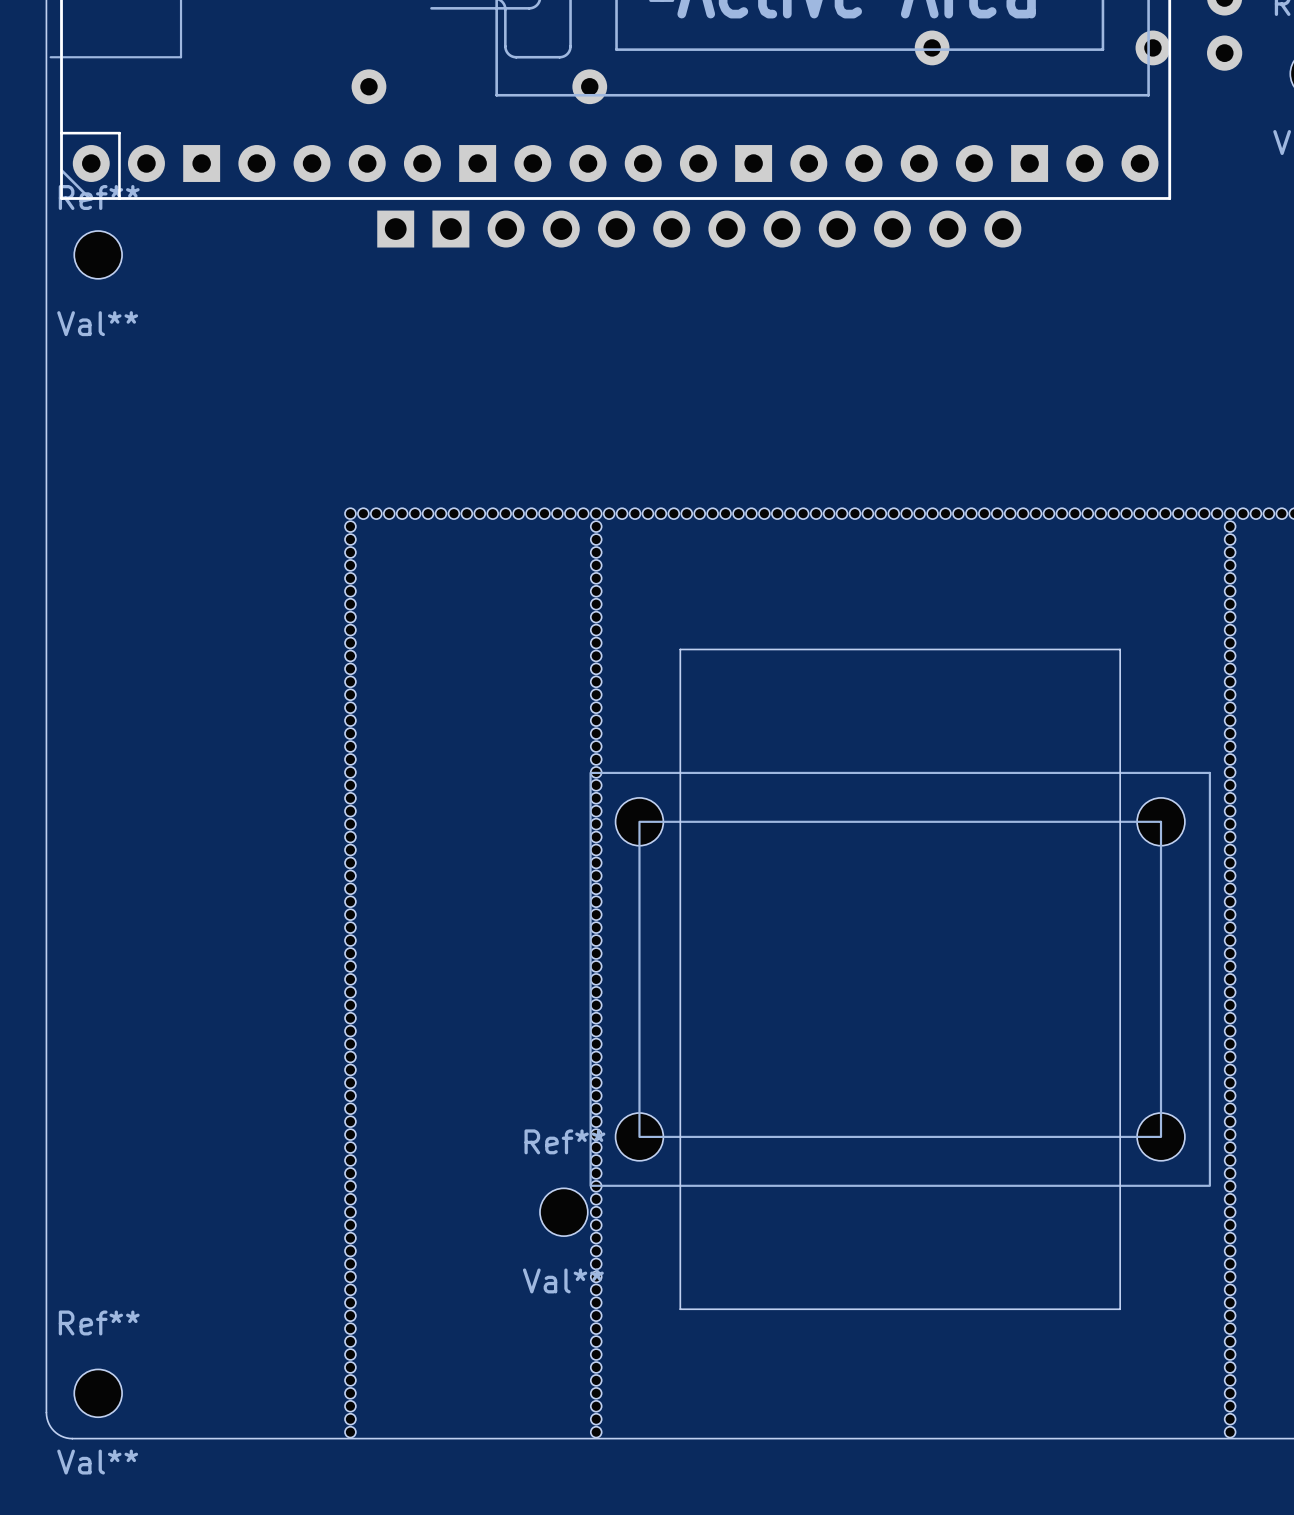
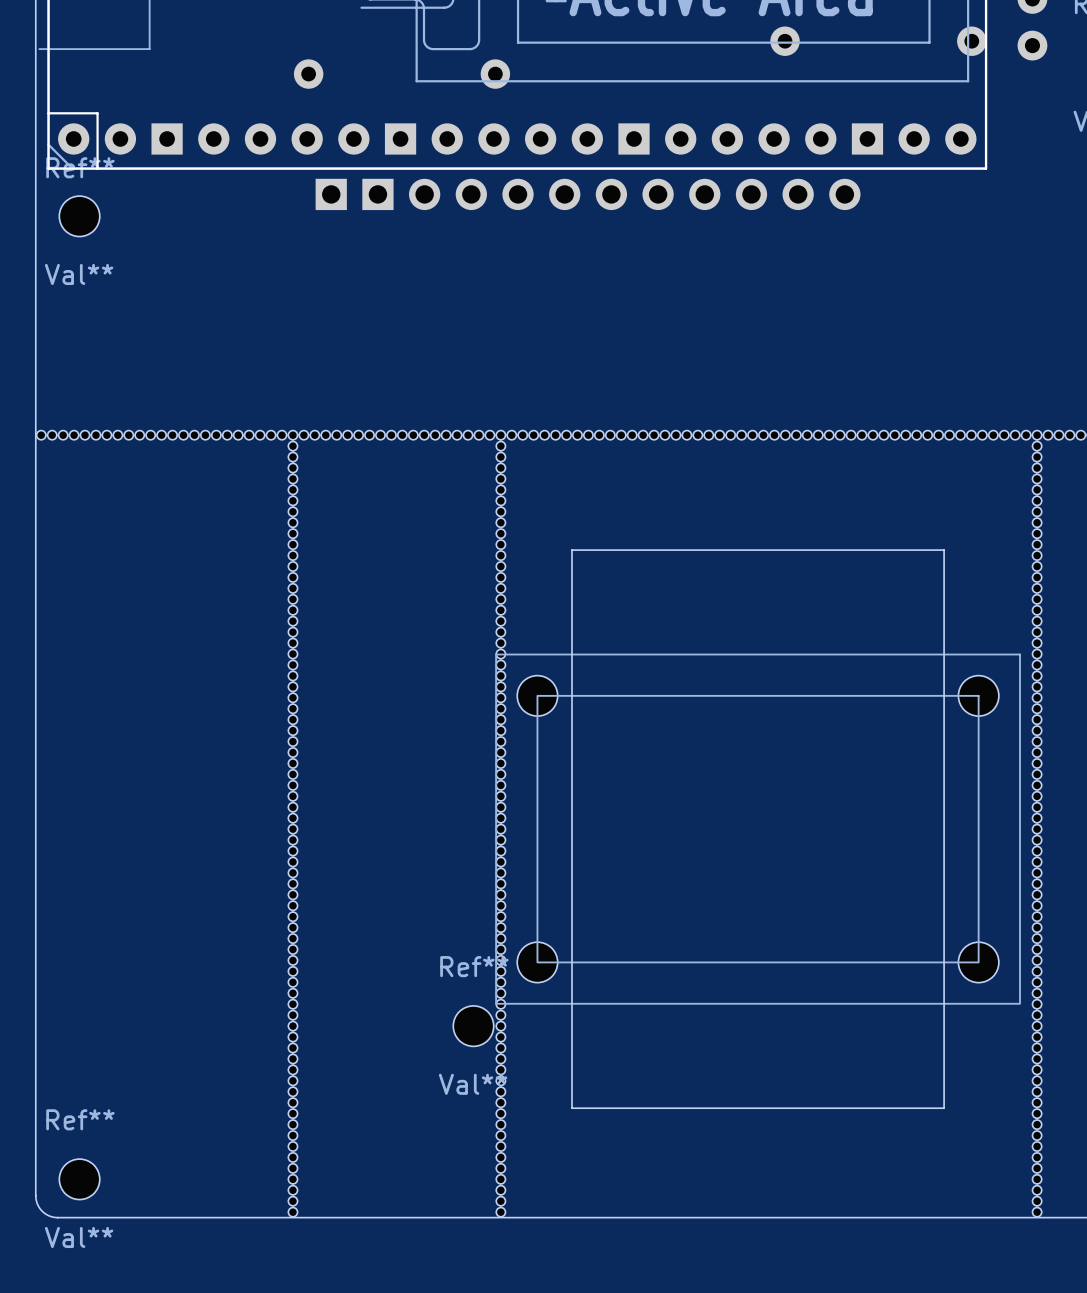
part: none -> (41, 435)
part: none -> (57, 435)
part: none -> (79, 435)
part: none -> (101, 435)
part: none -> (156, 435)
part: none -> (243, 435)

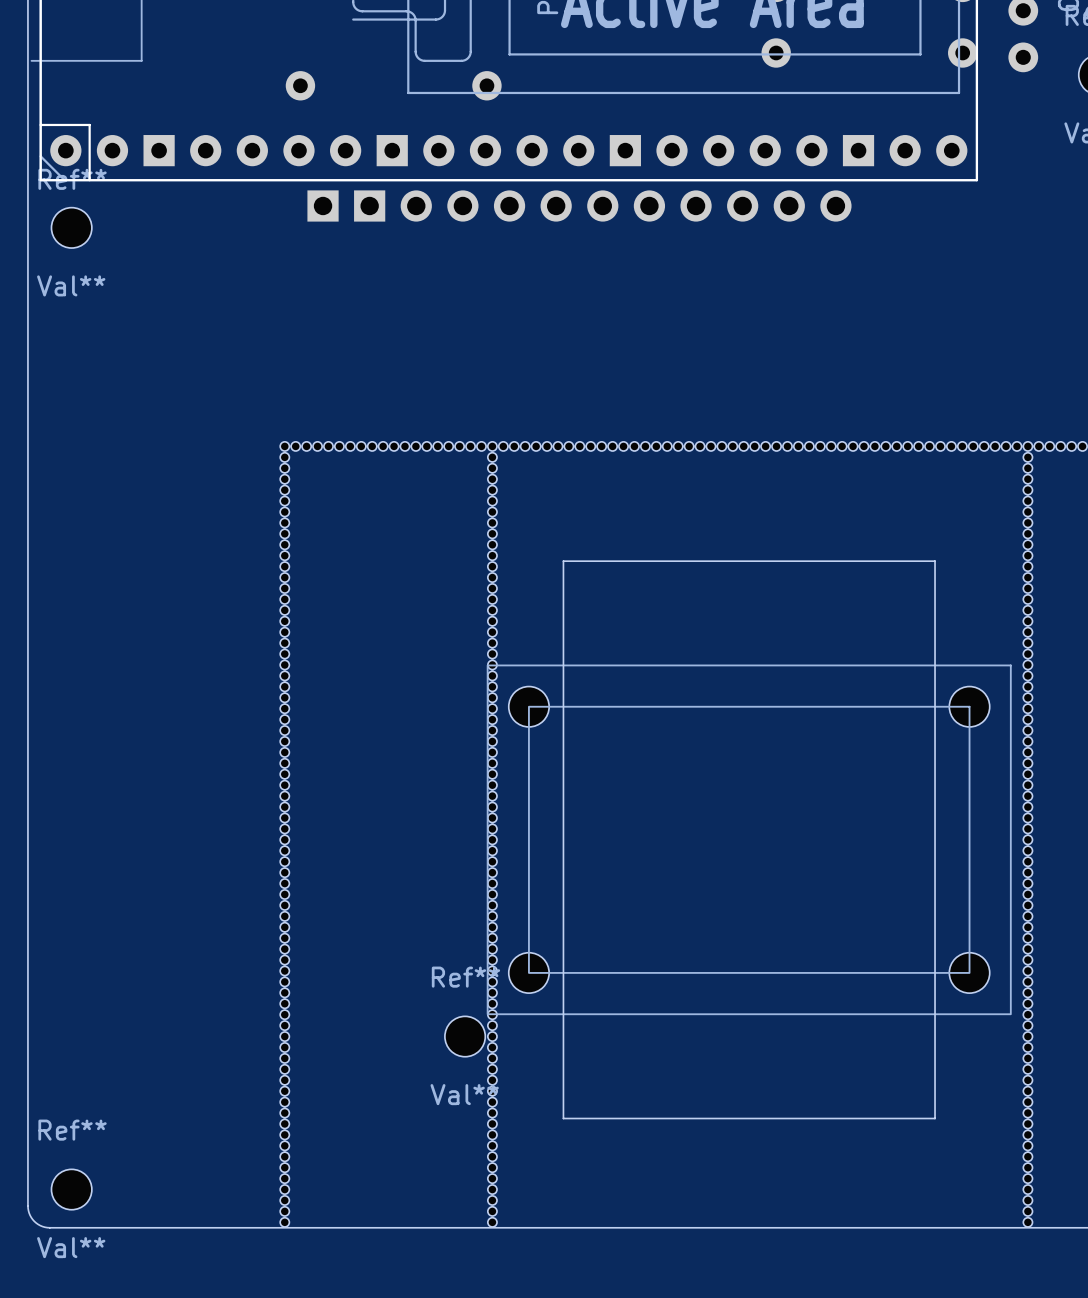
part: (41, 435) -> none
part: (57, 435) -> none
part: (79, 435) -> none
part: (101, 435) -> none
part: (156, 435) -> none
part: (243, 435) -> none

